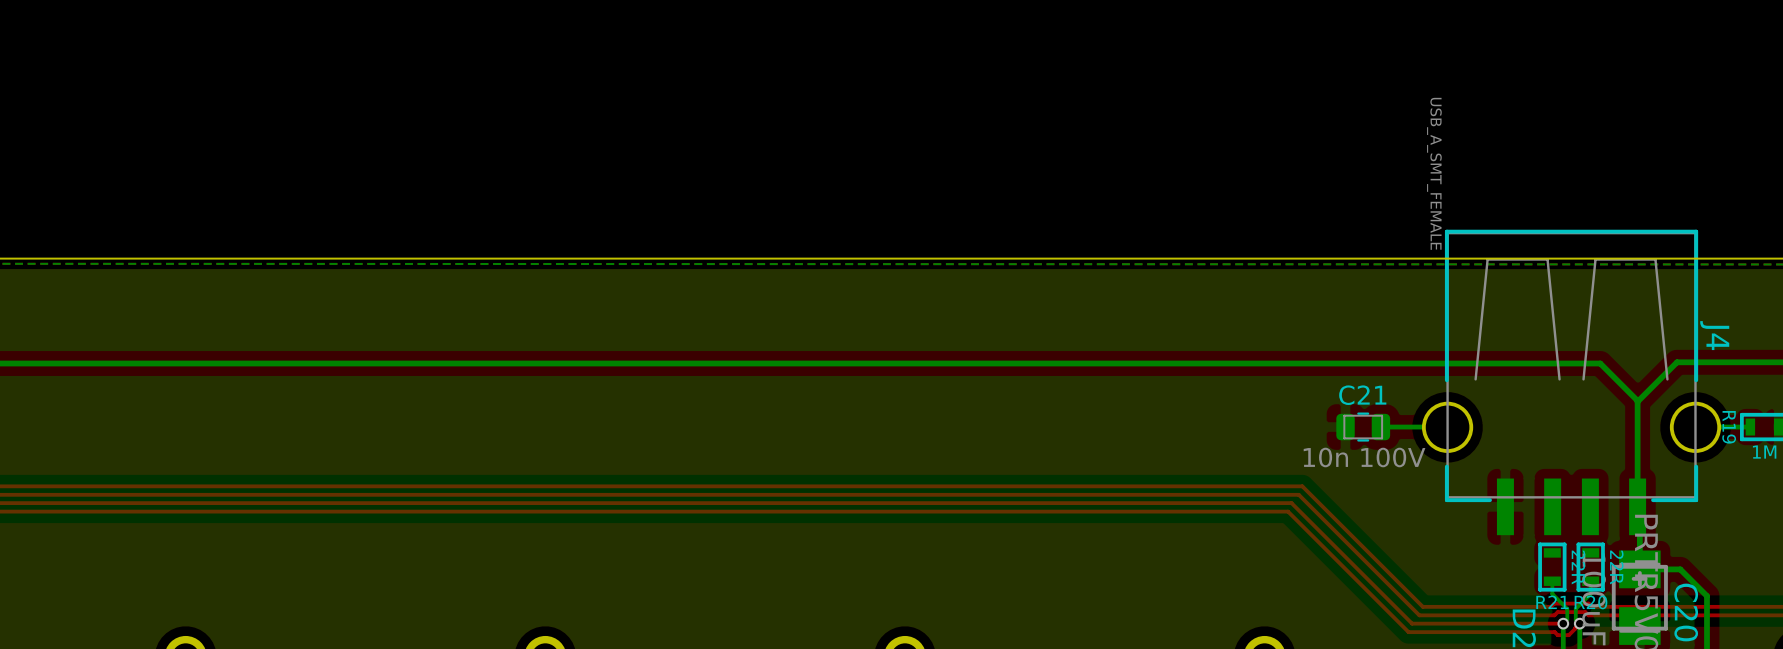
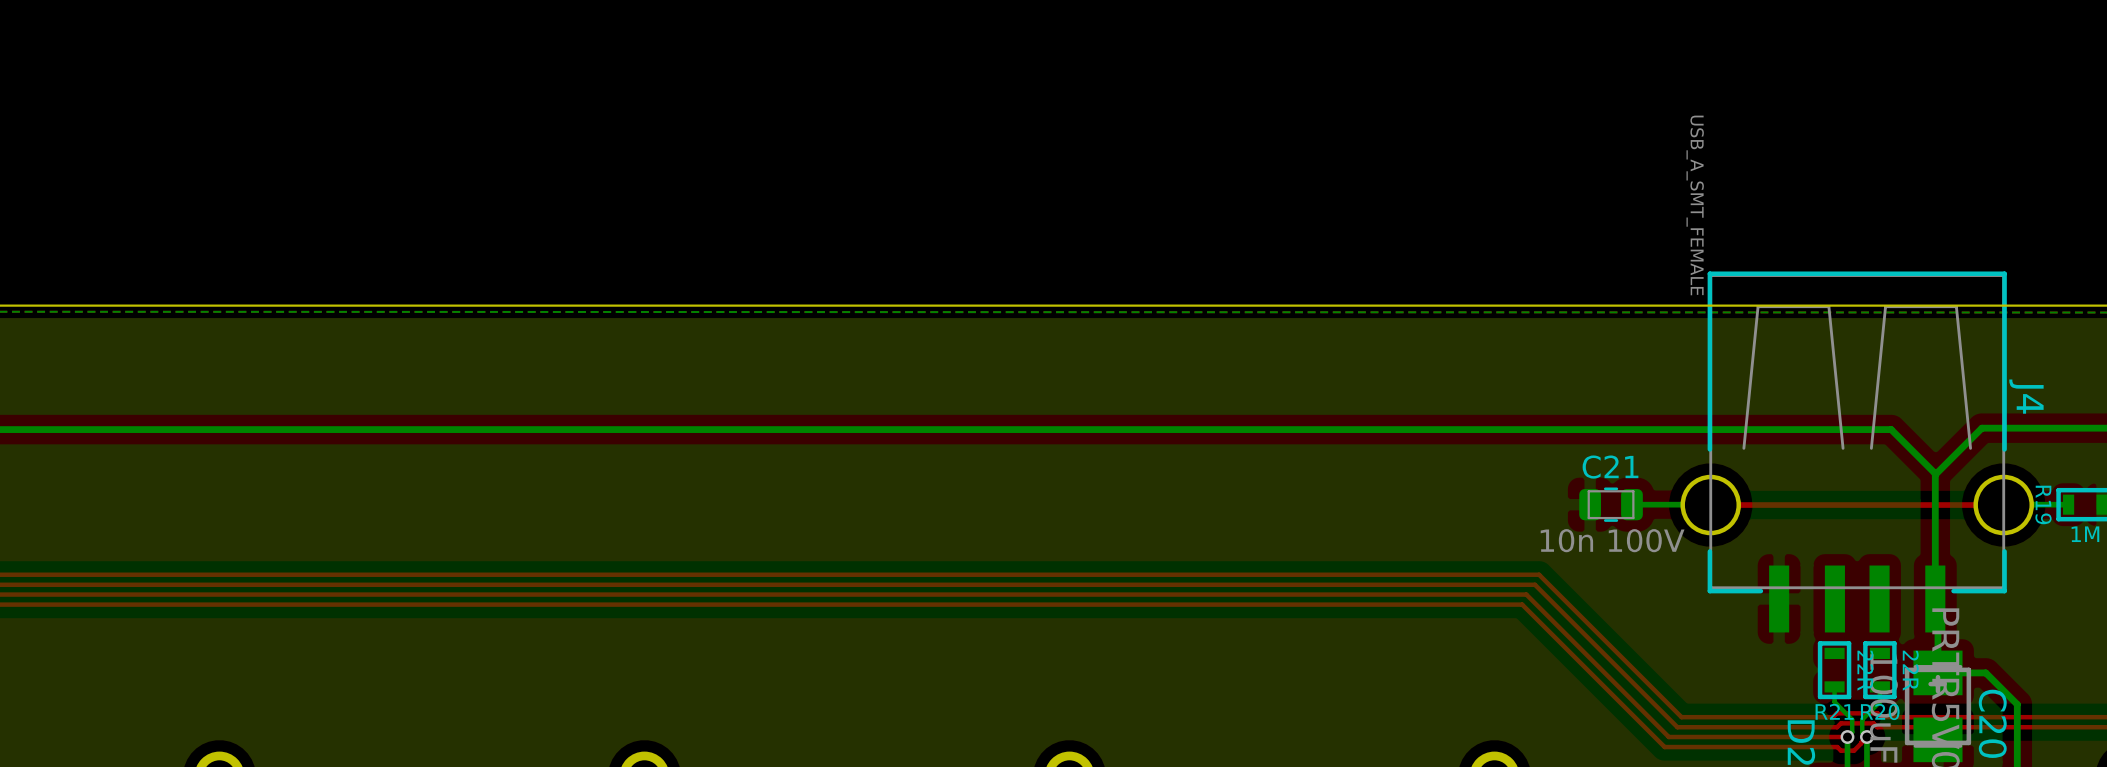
top track: none -> (2003, 505) (1710, 505)

